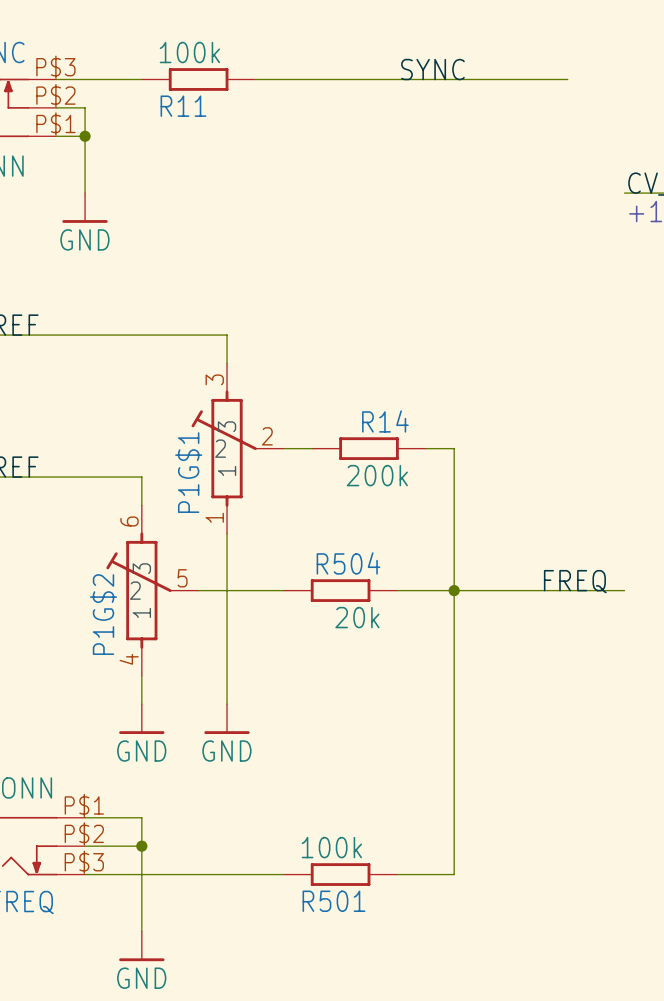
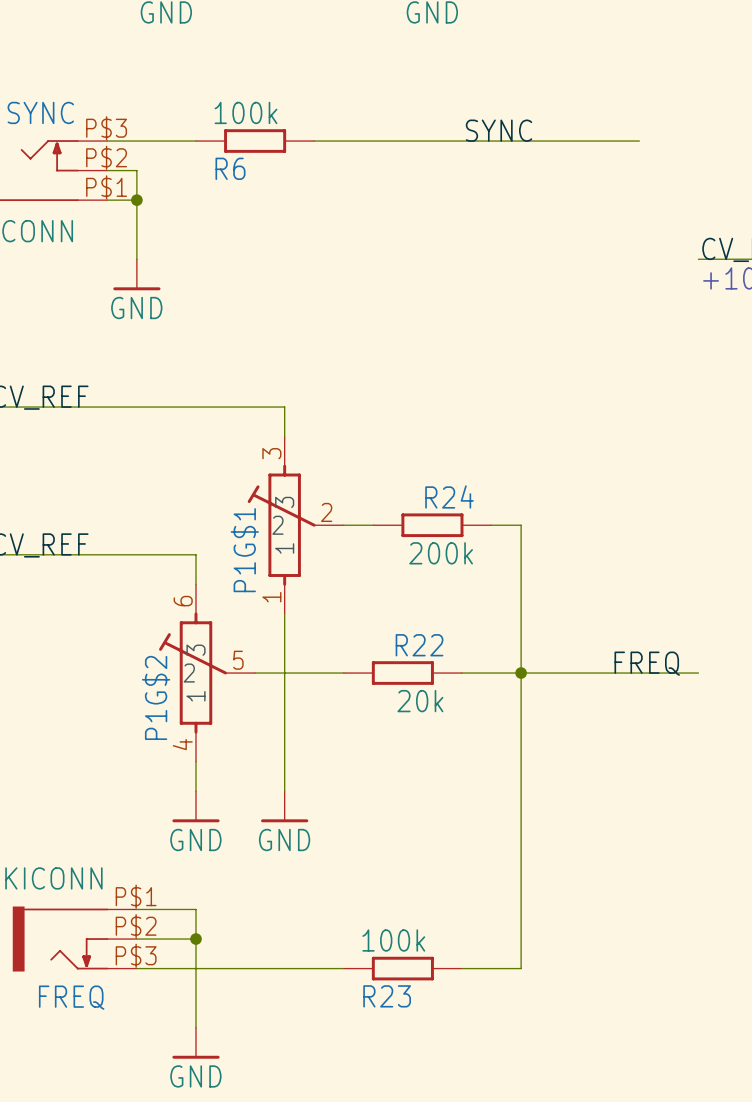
R11 name: R11 (183, 106) -> R6 (230, 168)
R14 name: R14 (385, 421) -> R24 (449, 496)
R504 name: R504 (348, 563) -> R22 (419, 645)
R501 name: R501 (333, 901) -> R23 (387, 996)

